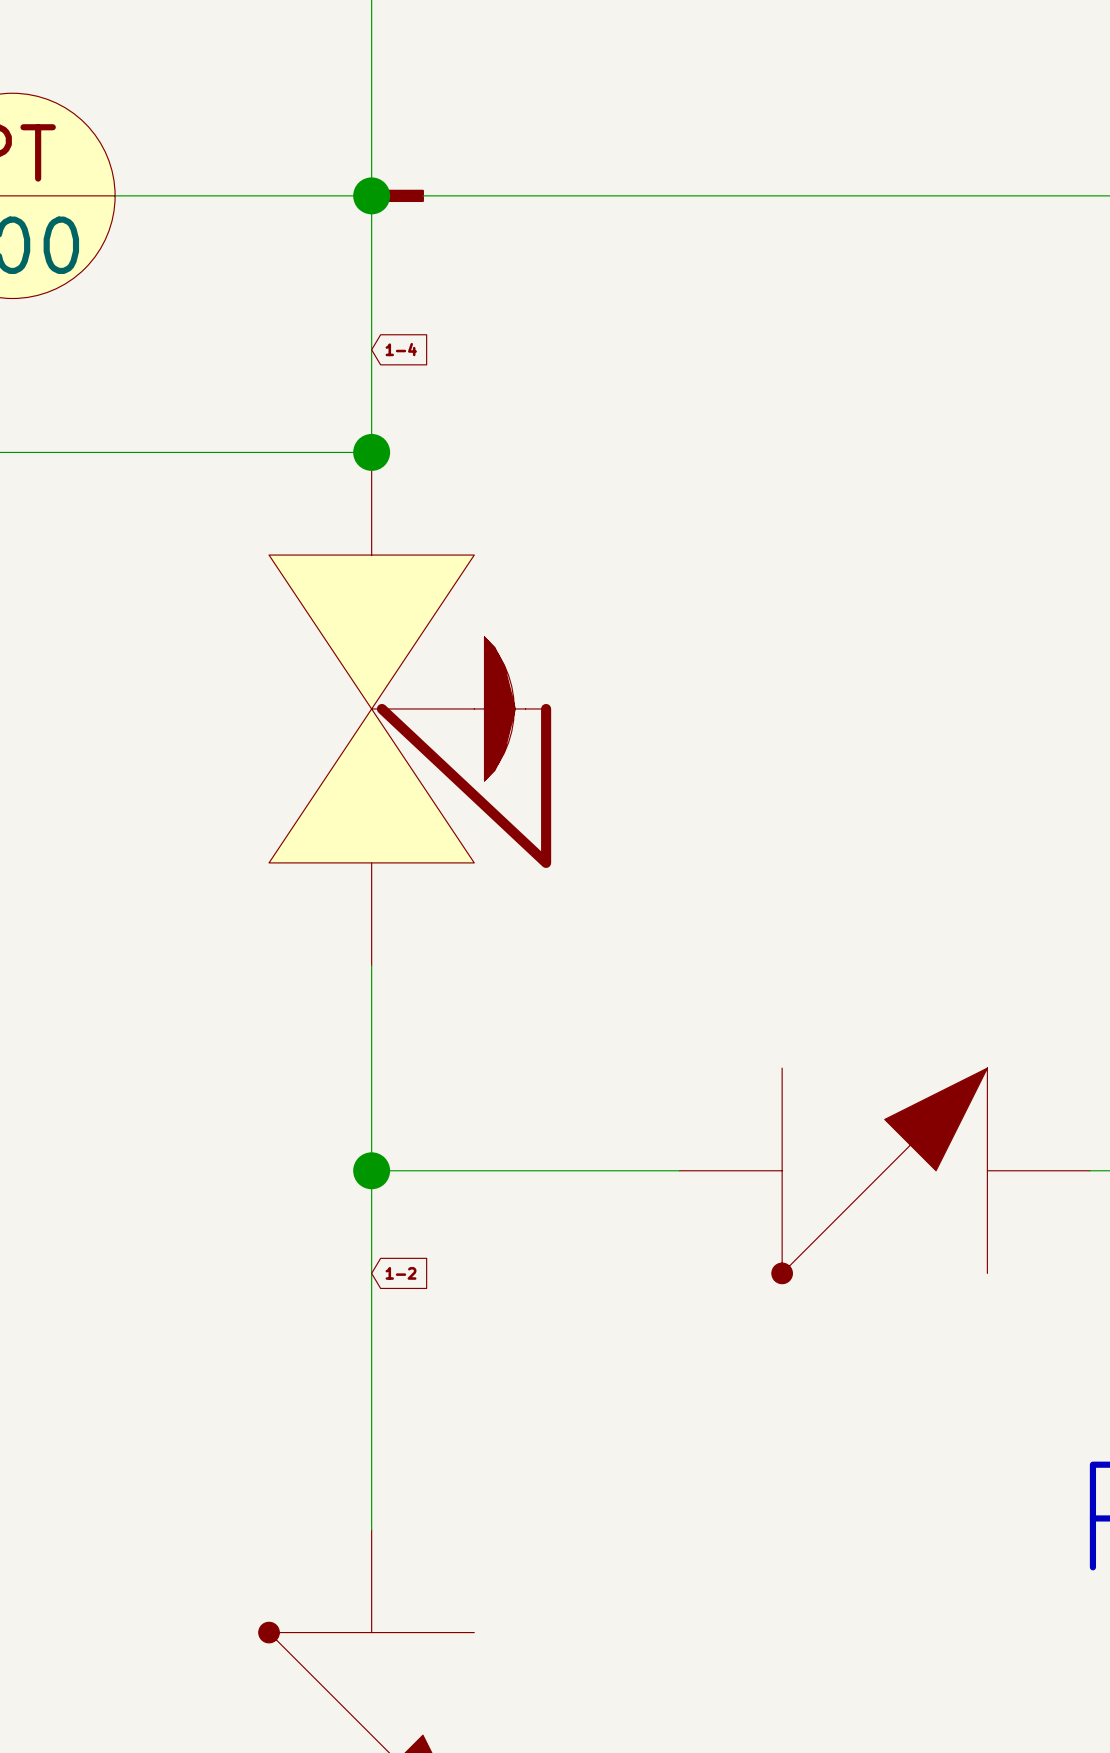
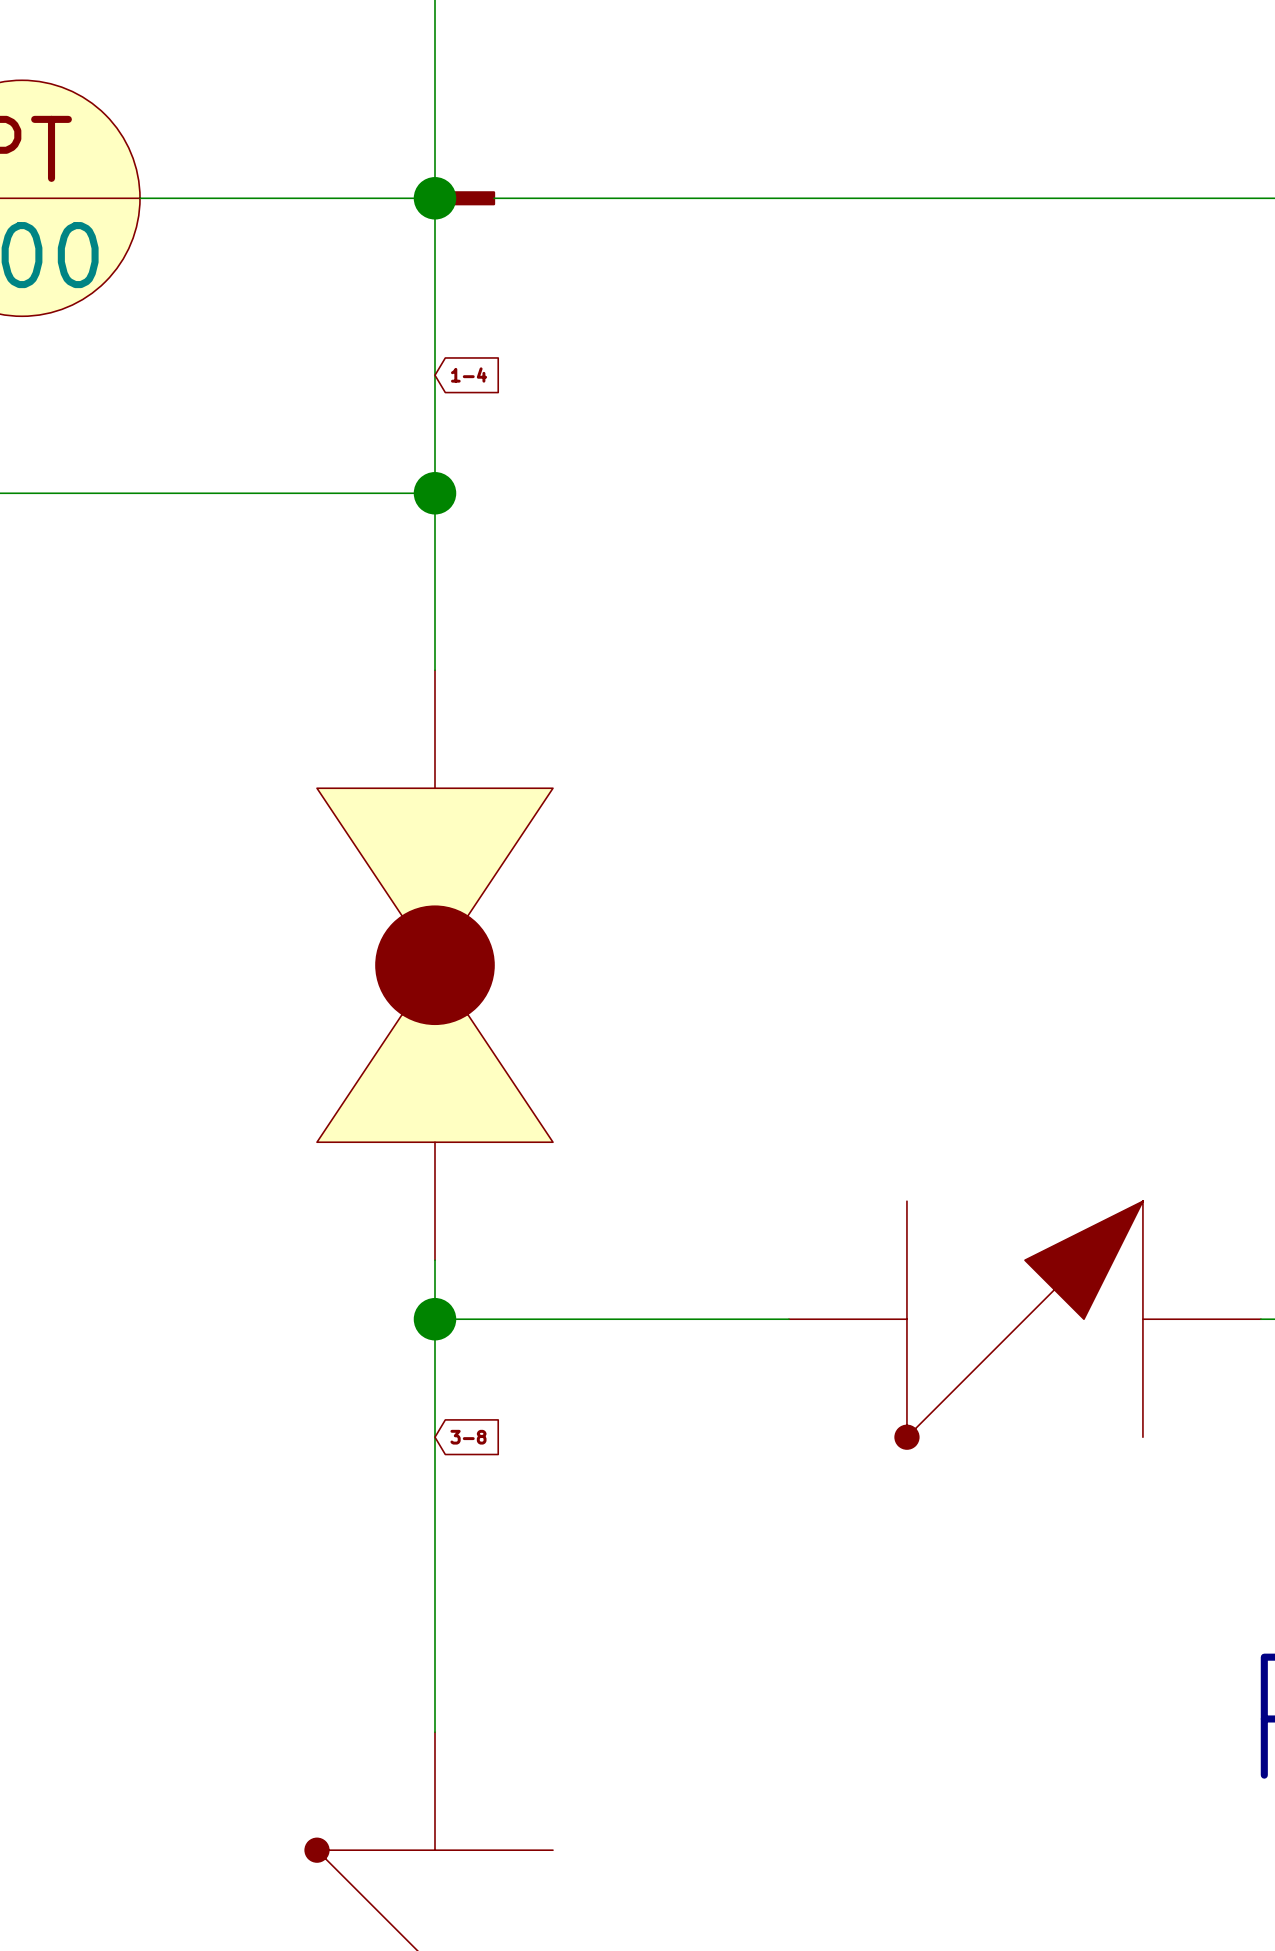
part: (410, 708) -> none
part: none -> (434, 965)
global label: 1-2 (401, 1273) -> 3-8 (468, 1437)

